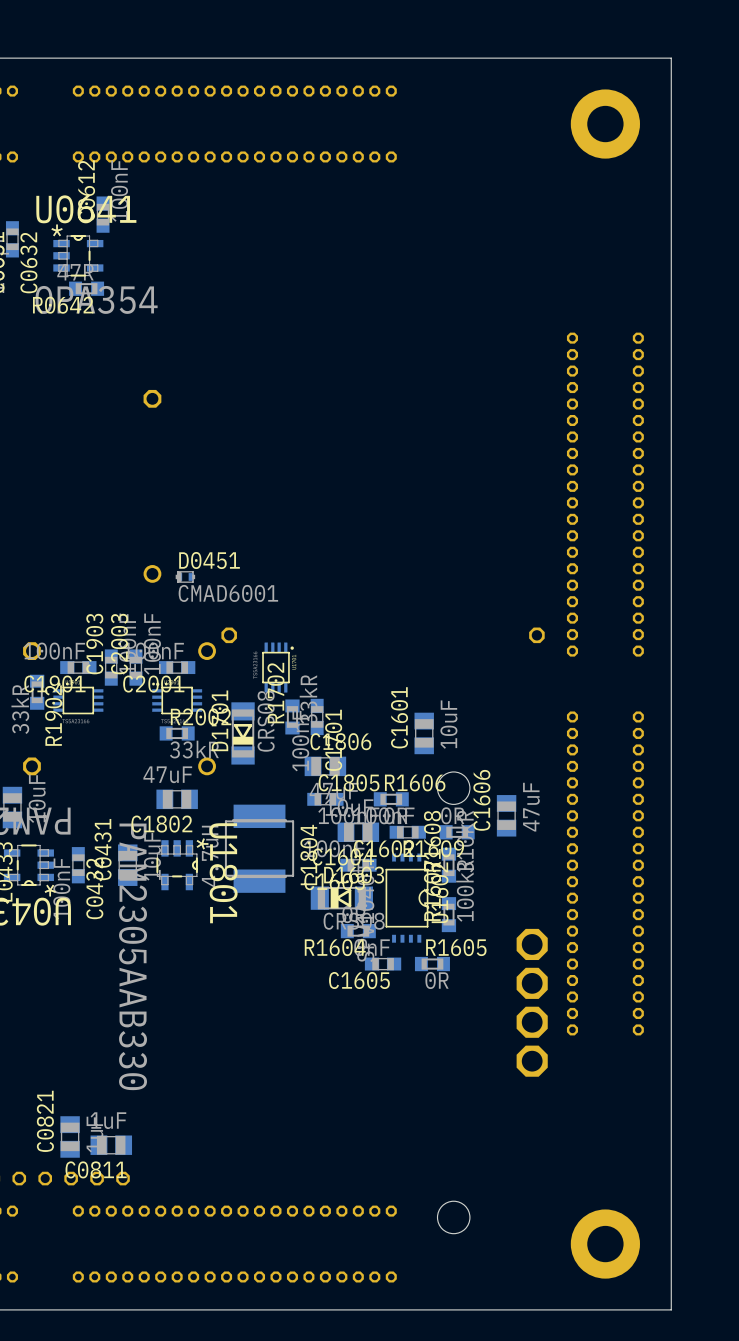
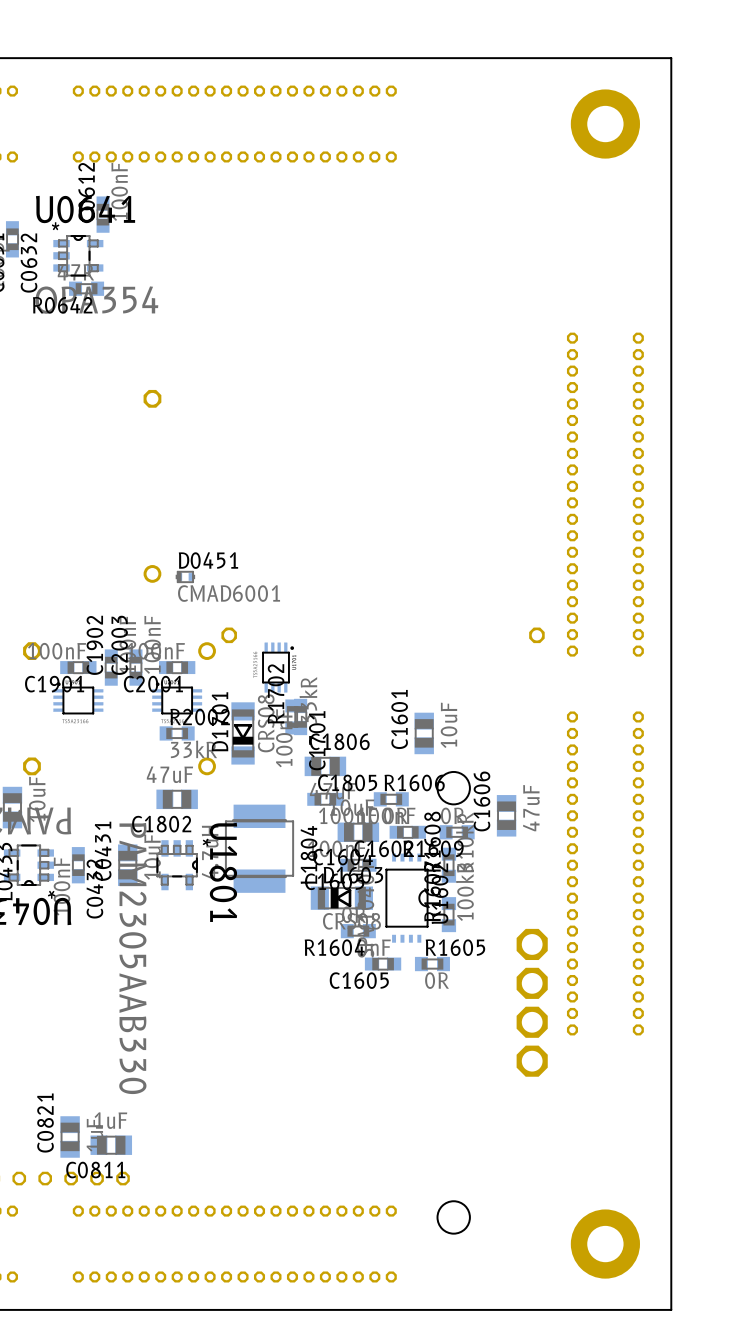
C1903 name: C1903 (94, 644) -> C1902 (94, 645)
R1902: 33kR (37, 692) -> none
C1701 position: (317, 716) -> (300, 716)

